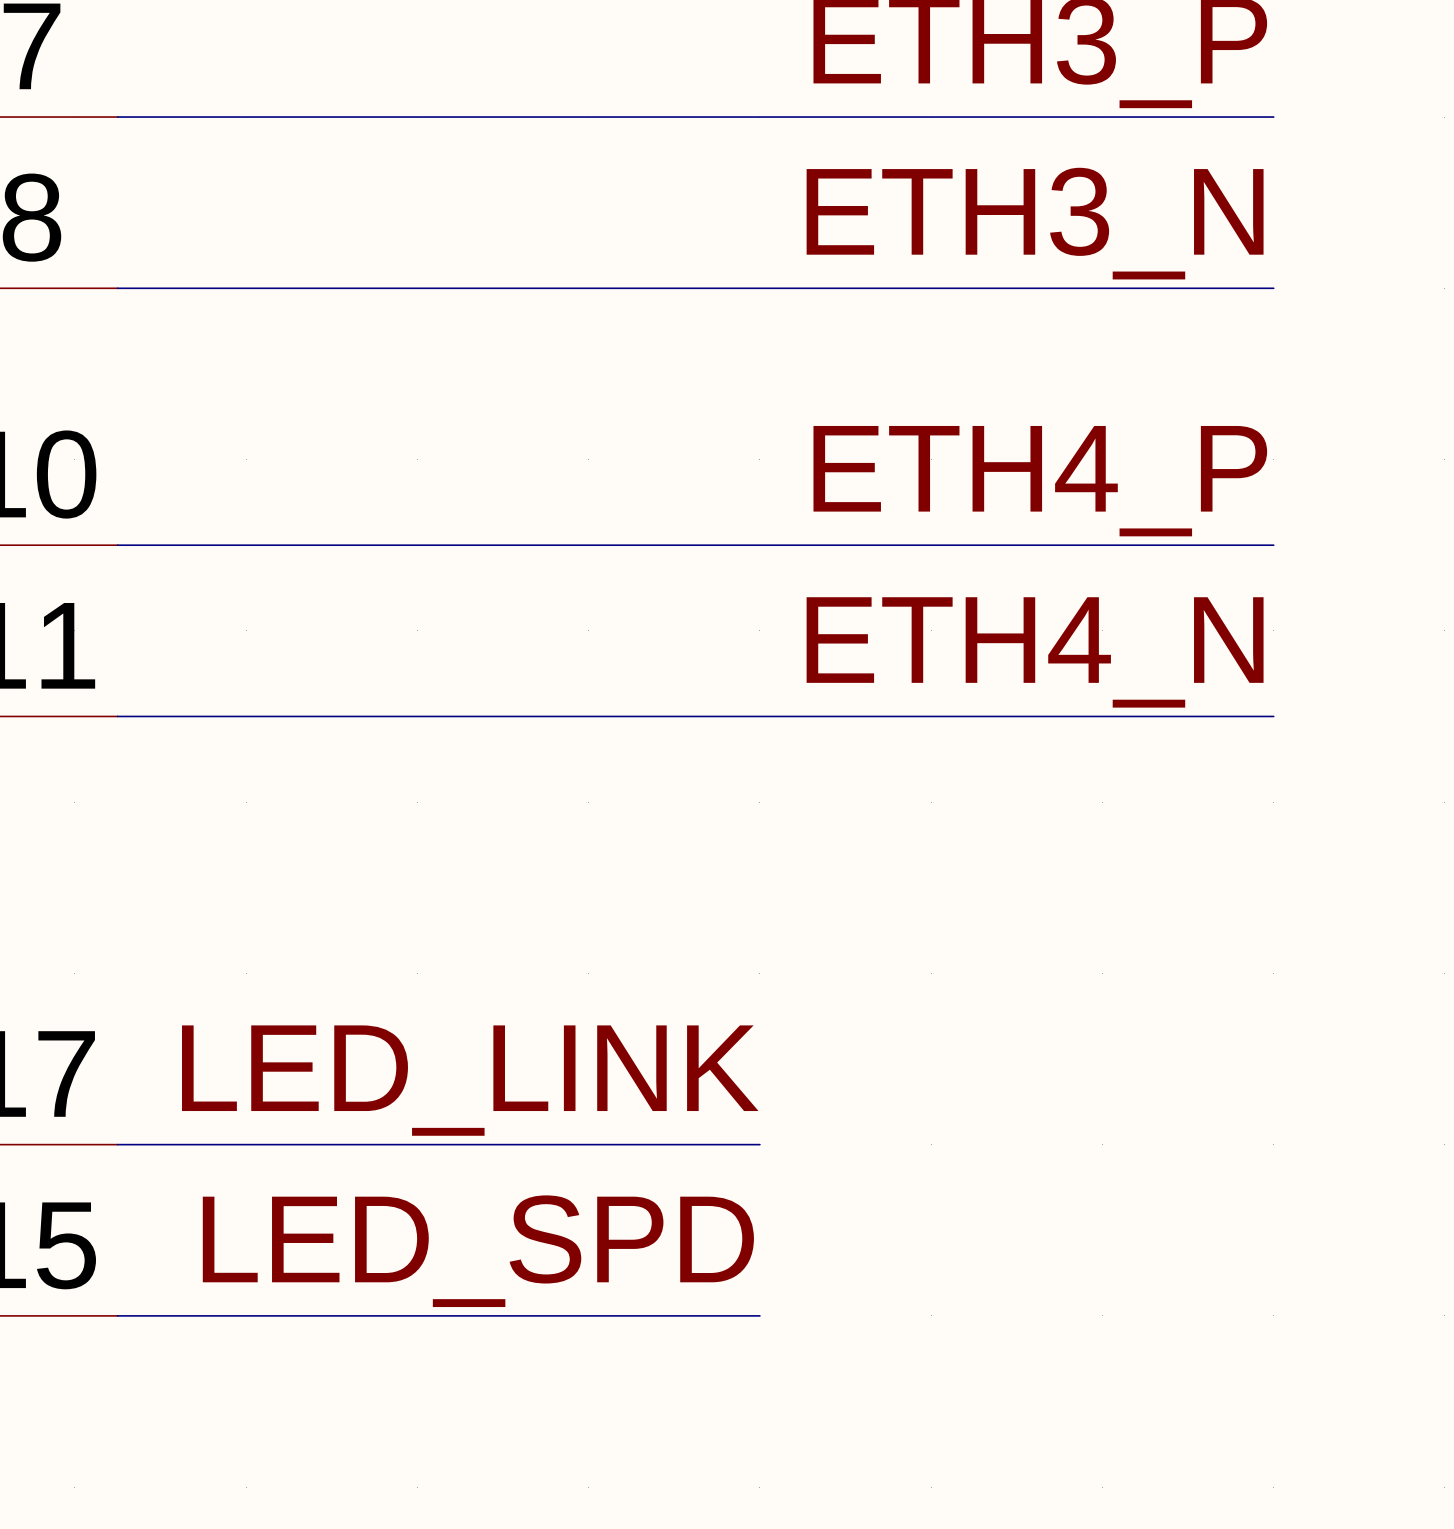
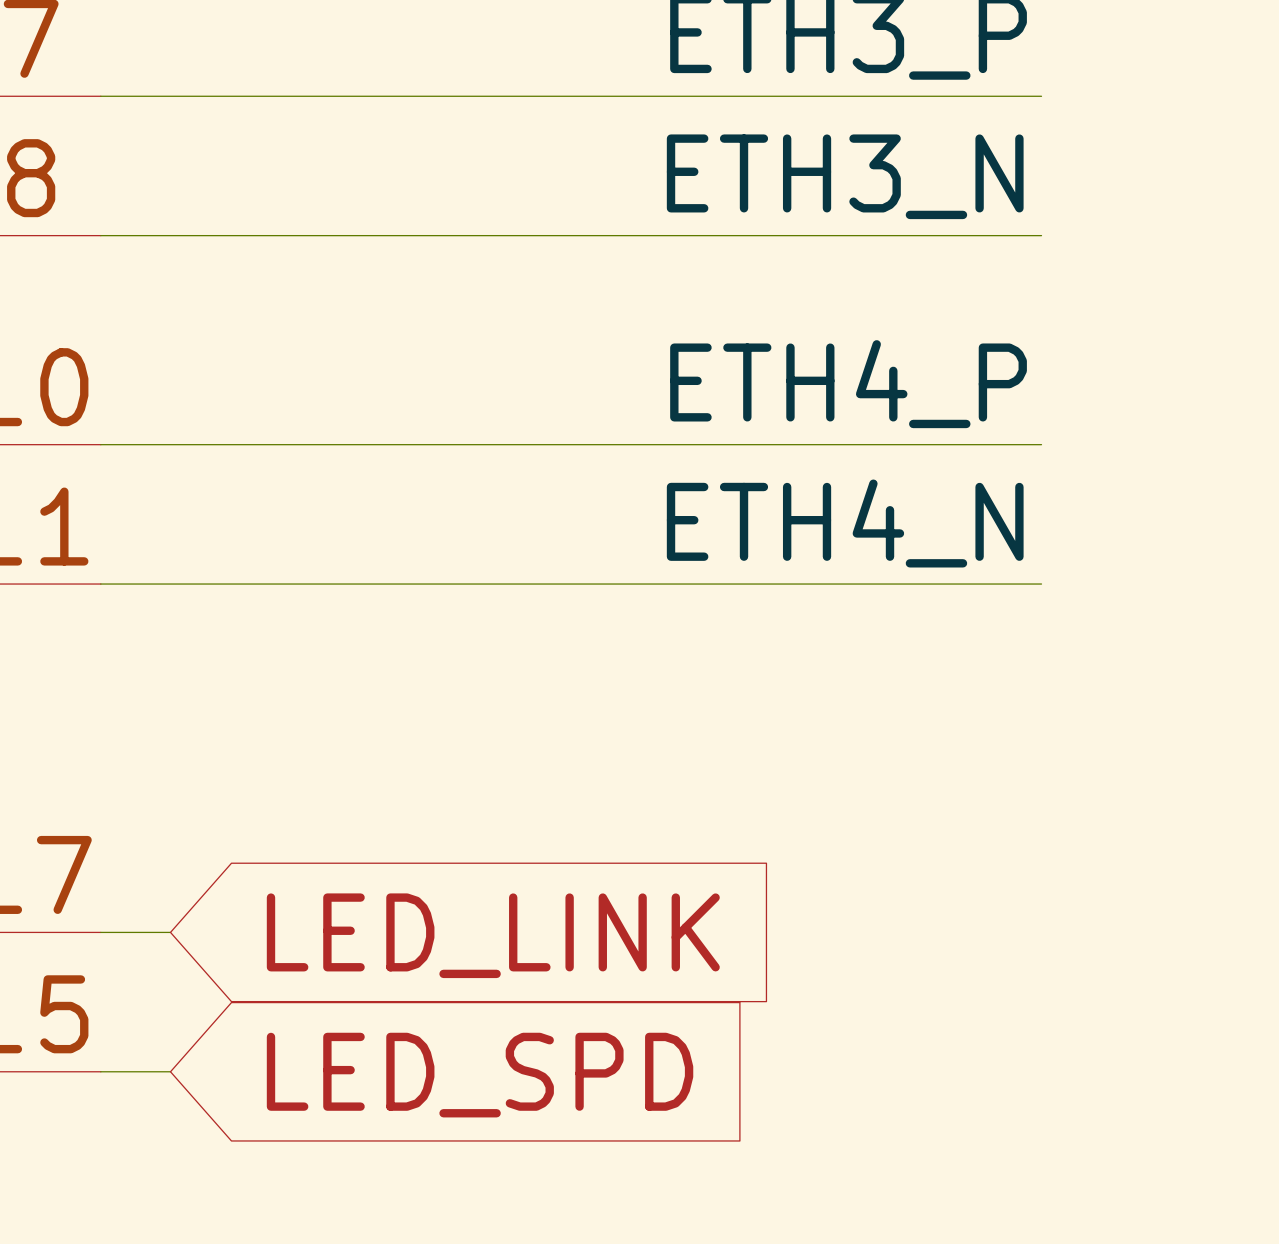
label: LED_LINK (470, 1080) -> none
wire: (203, 1144) (759, 1144) -> none
global label: none -> LED_LINK (493, 935)
label: LED_SPD (478, 1251) -> none
wire: (203, 1315) (759, 1315) -> none
global label: none -> LED_SPD (480, 1075)

